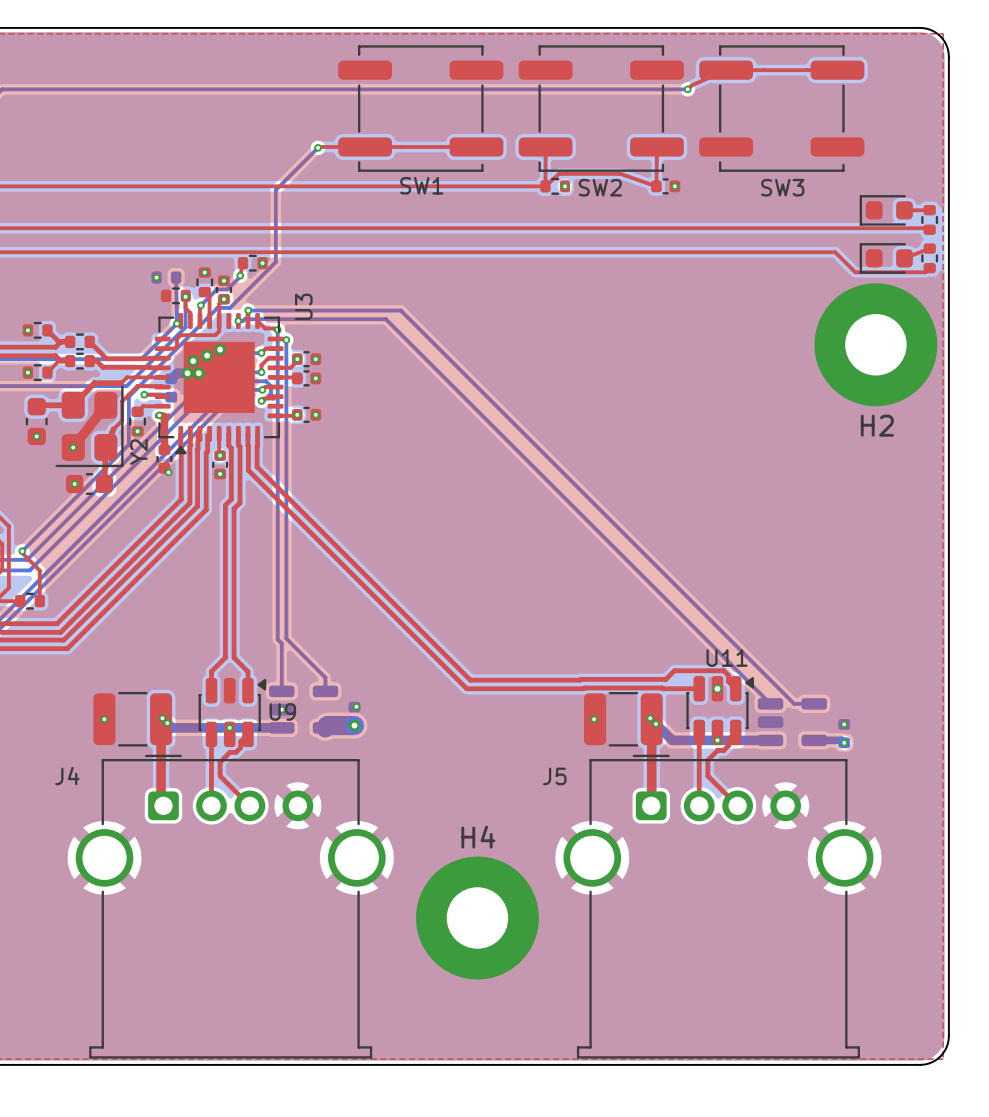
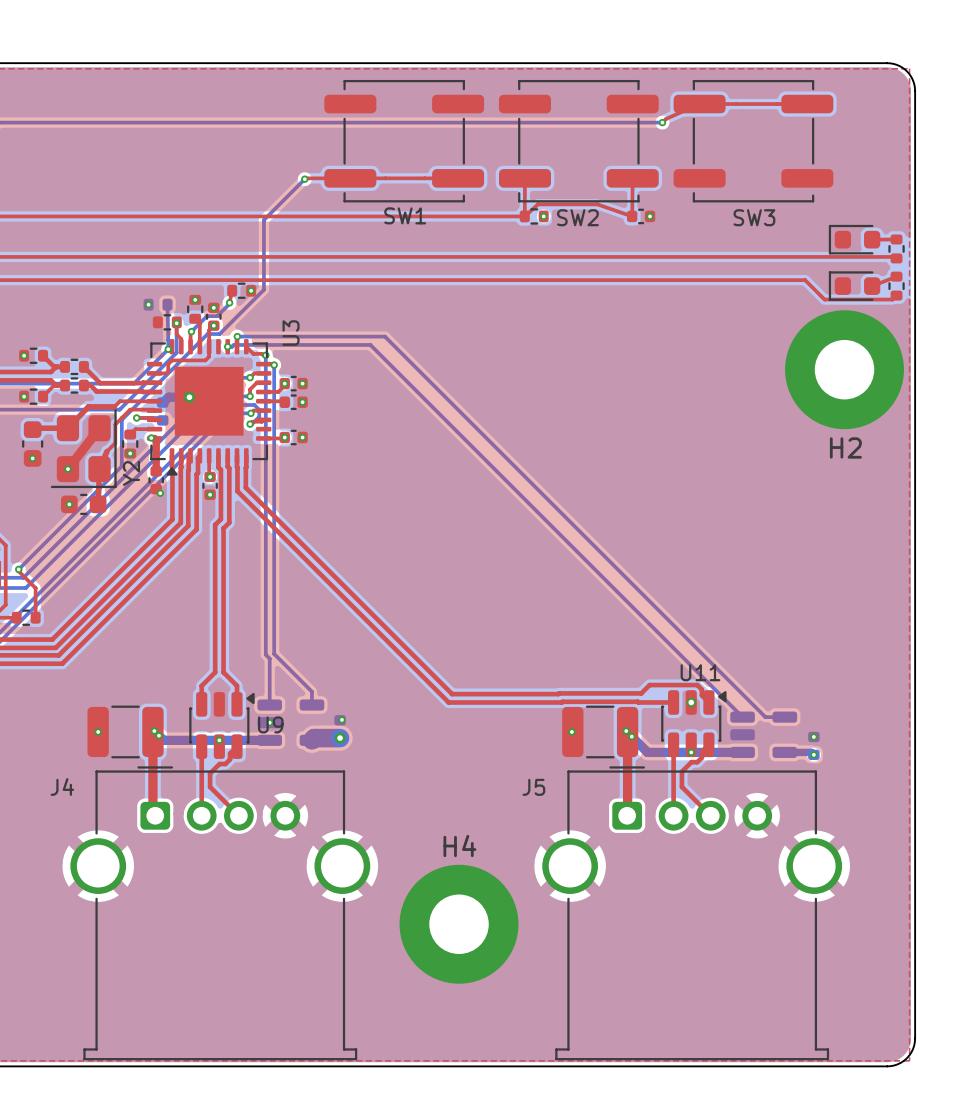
via: (220, 349) -> none
via: (207, 355) -> none
via: (193, 361) -> none
via: (187, 373) -> none

